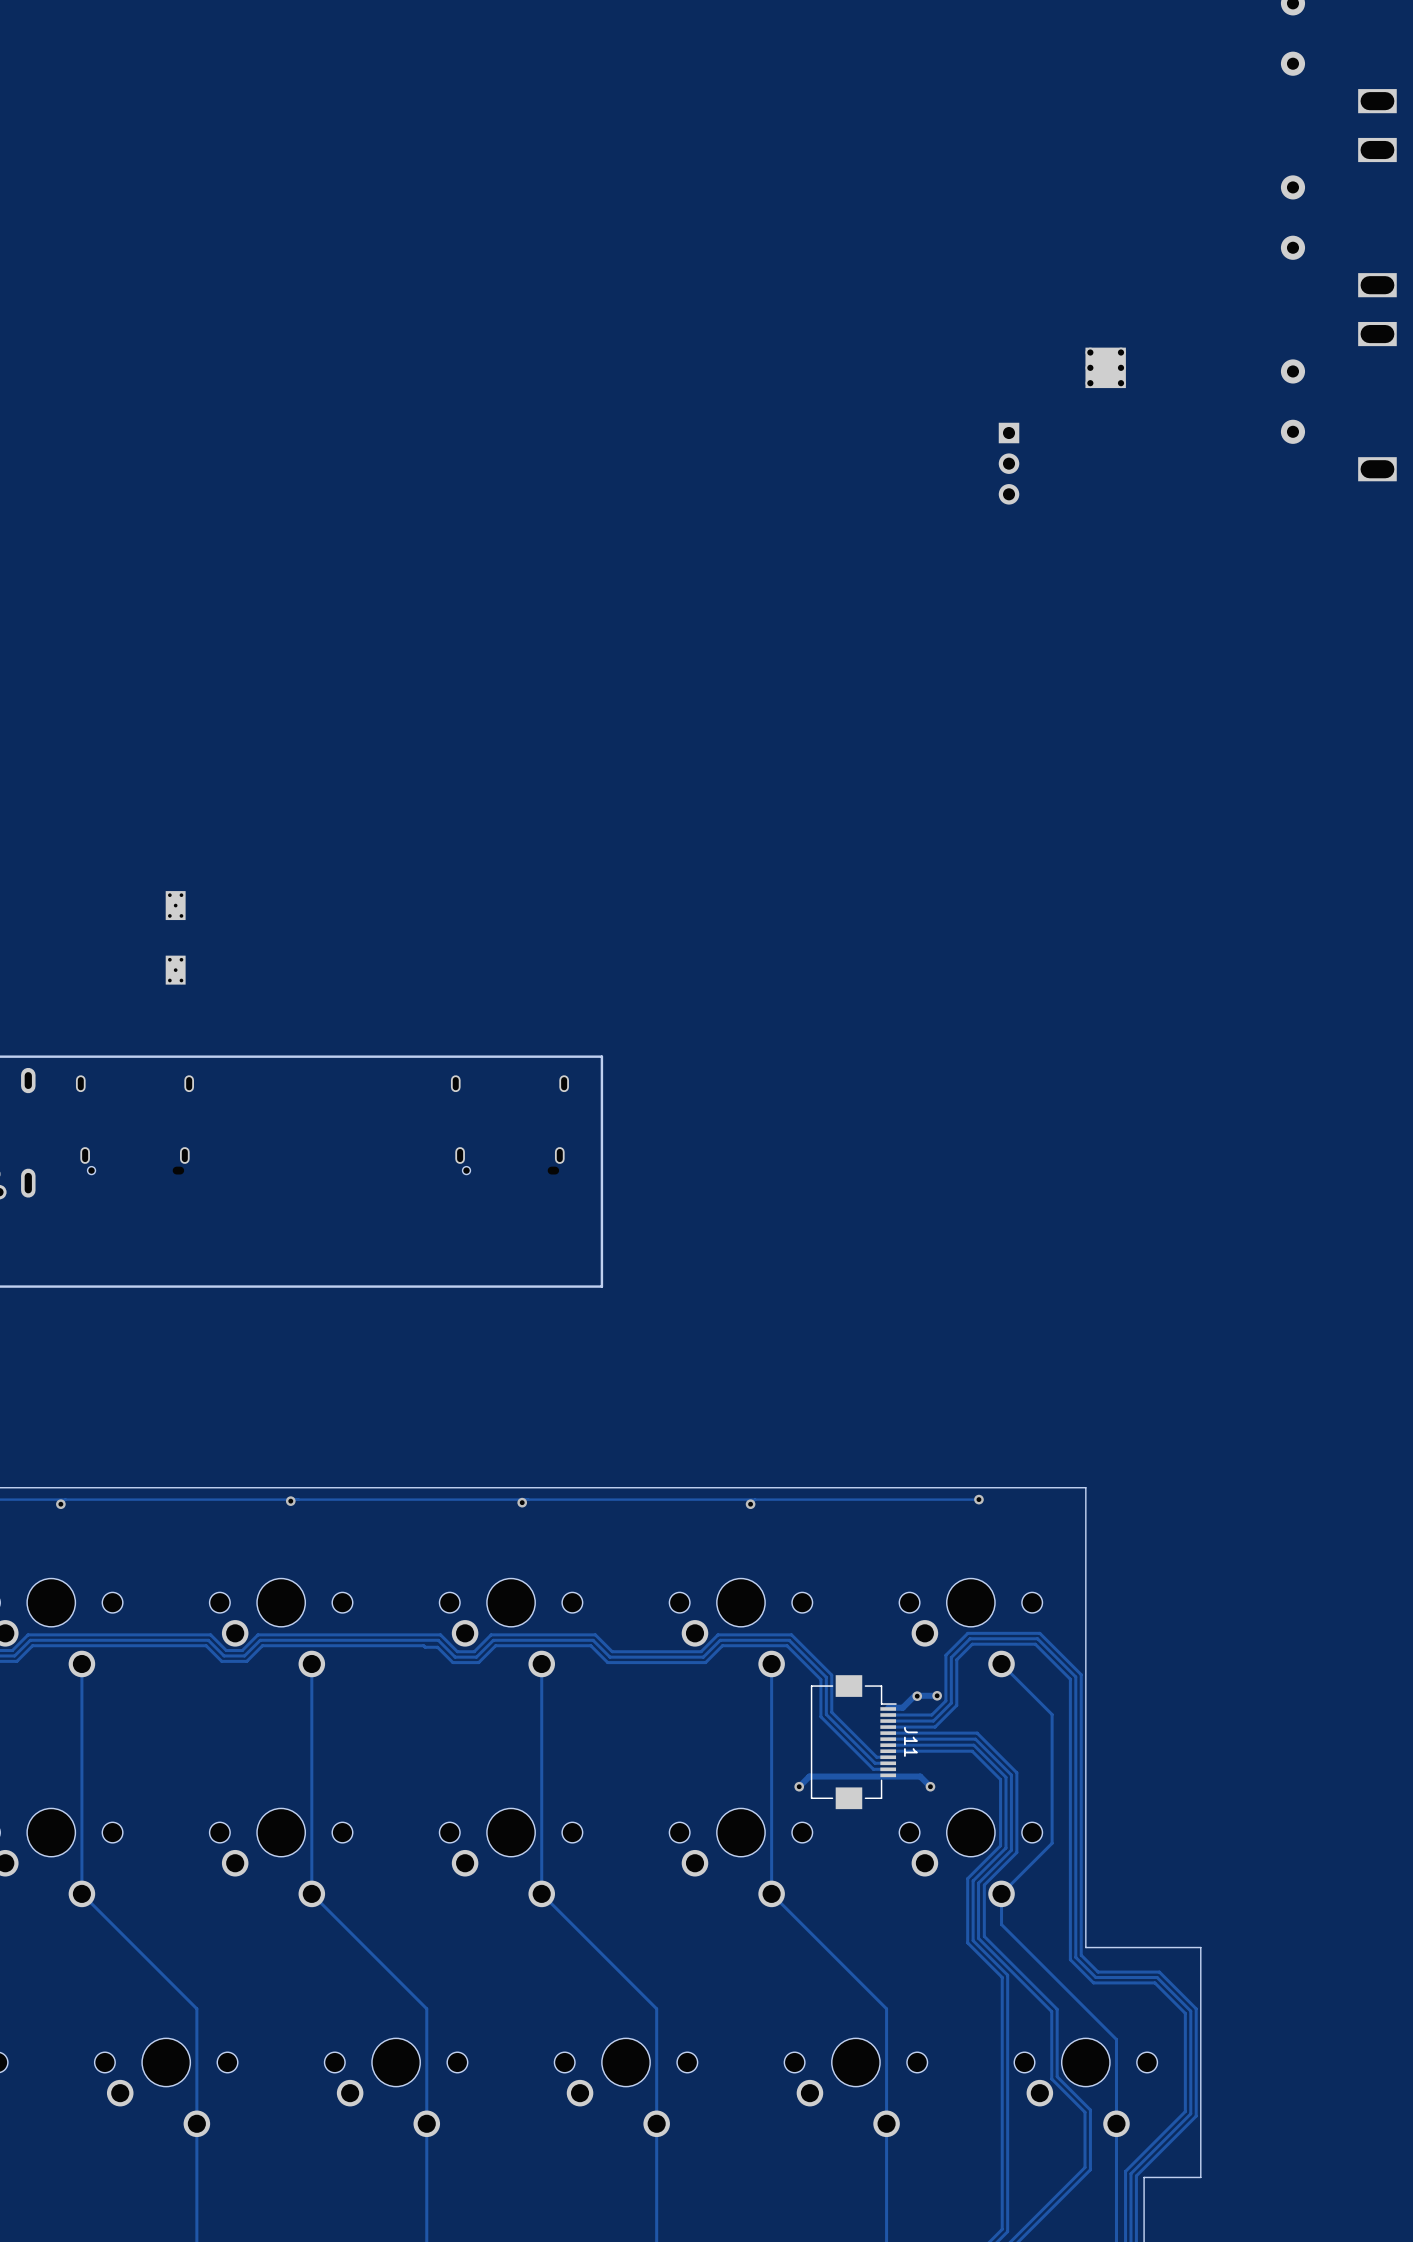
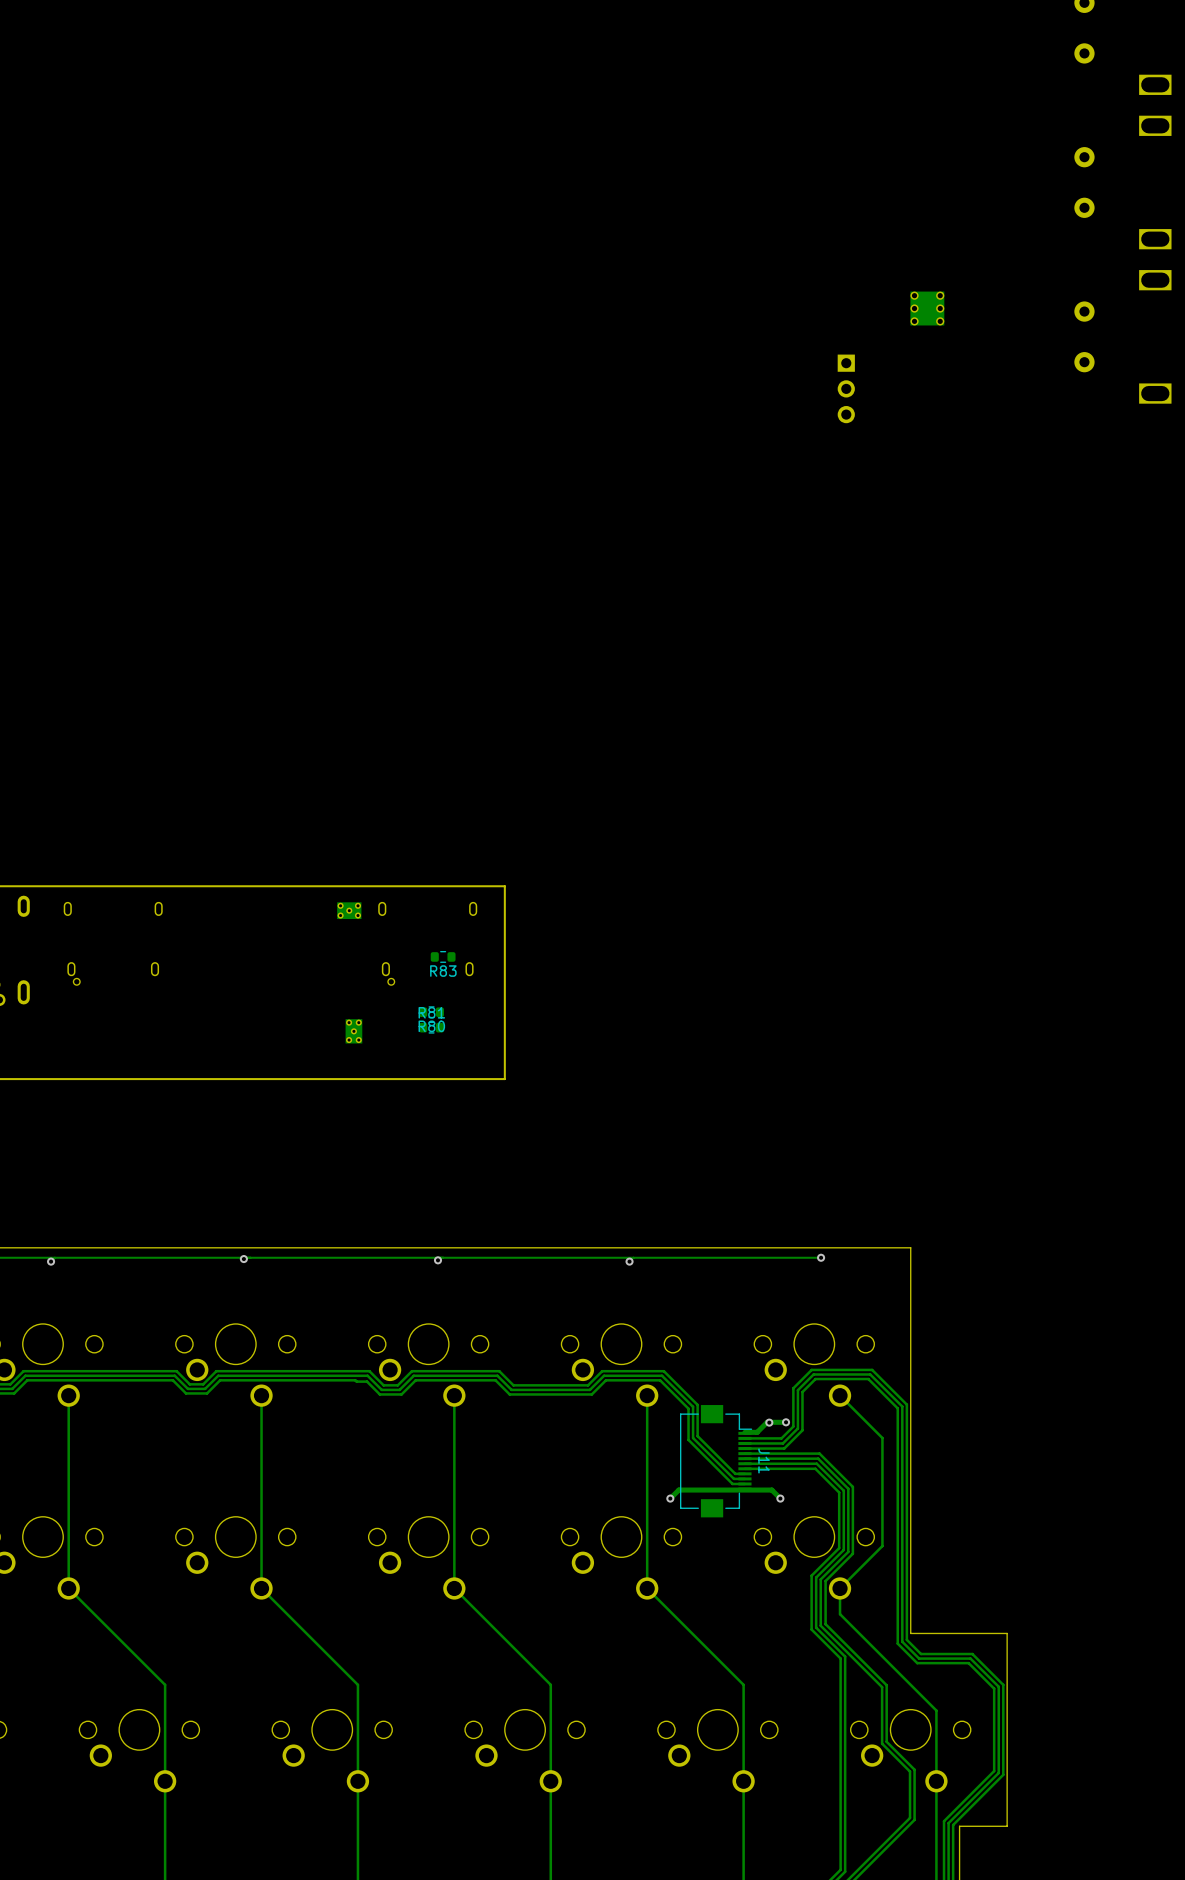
part: (175, 905) -> none
part: (175, 970) -> none
part: none -> (349, 910)
R83: none -> (443, 956)
R80: none -> (431, 1012)
R81: none -> (431, 1027)
part: none -> (353, 1031)

